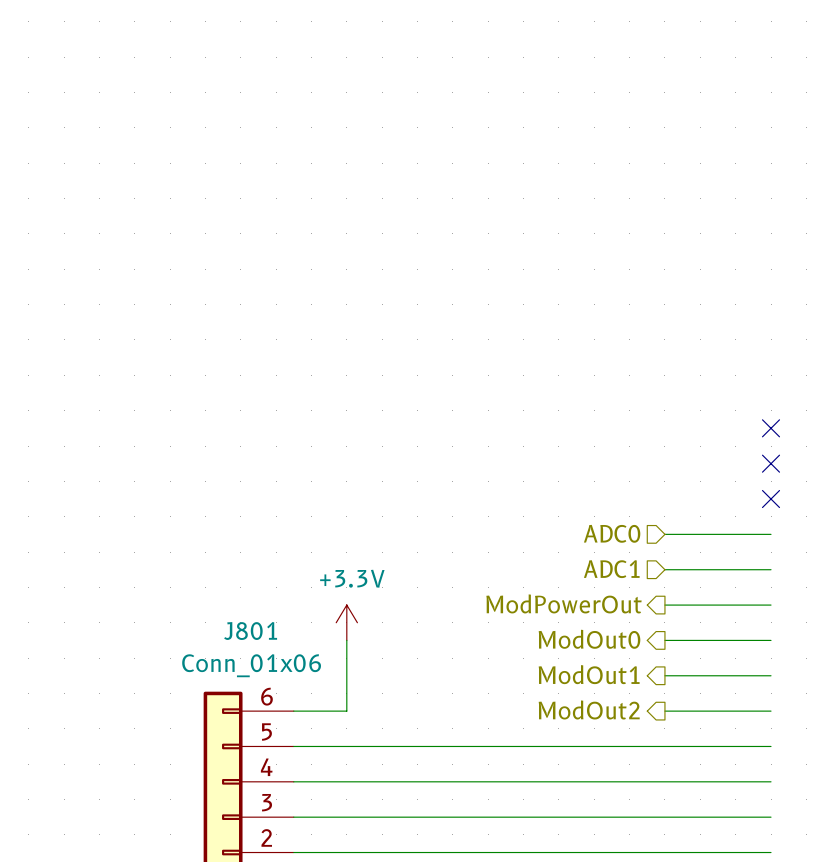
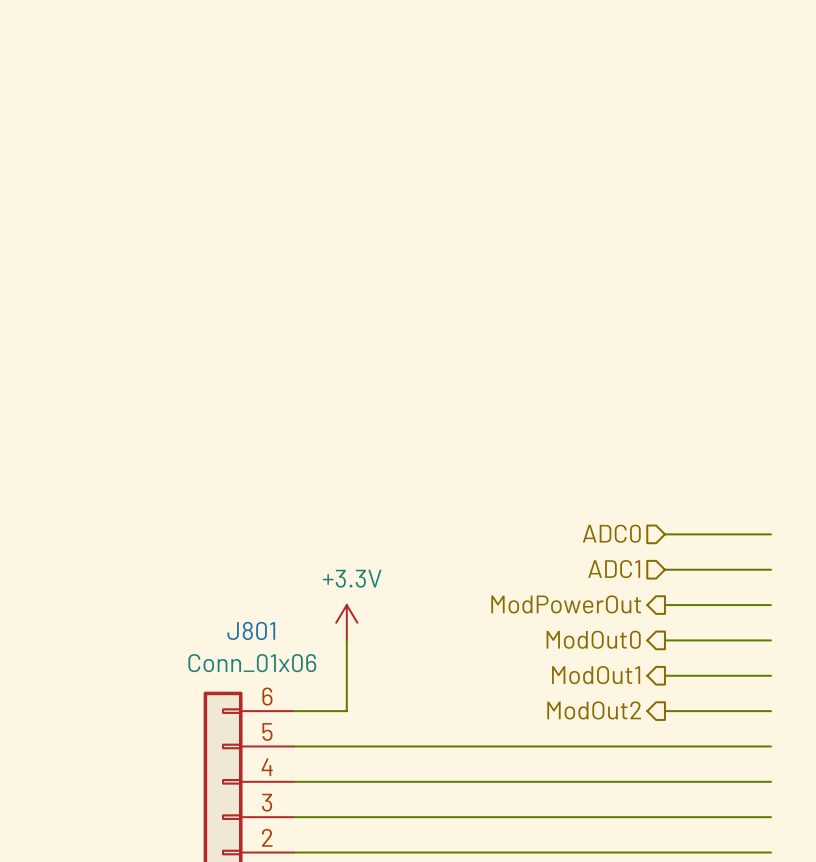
no-connect mark: (771, 428) -> none
no-connect mark: (771, 463) -> none
no-connect mark: (771, 499) -> none

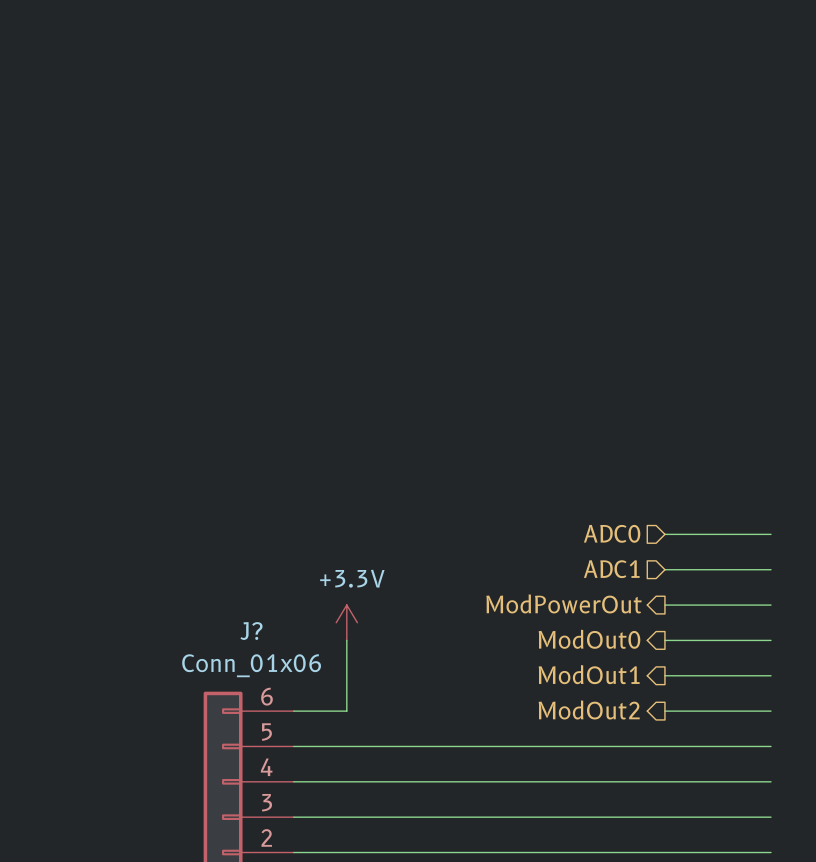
J801 name: J801 (251, 630) -> J? (251, 631)

